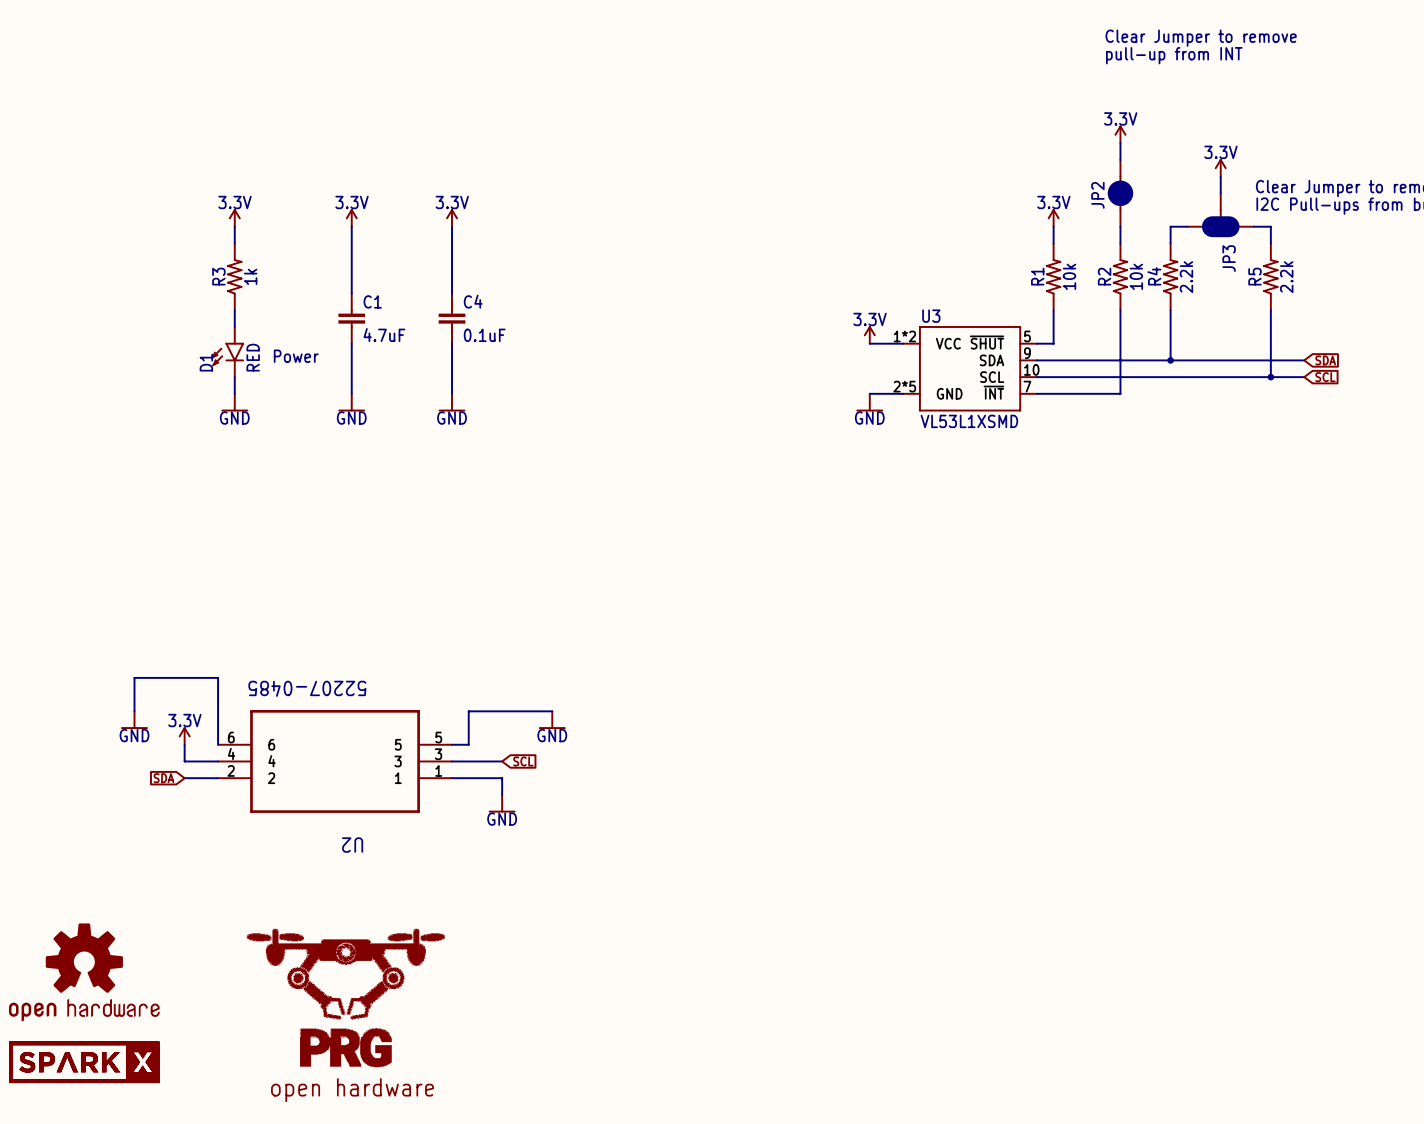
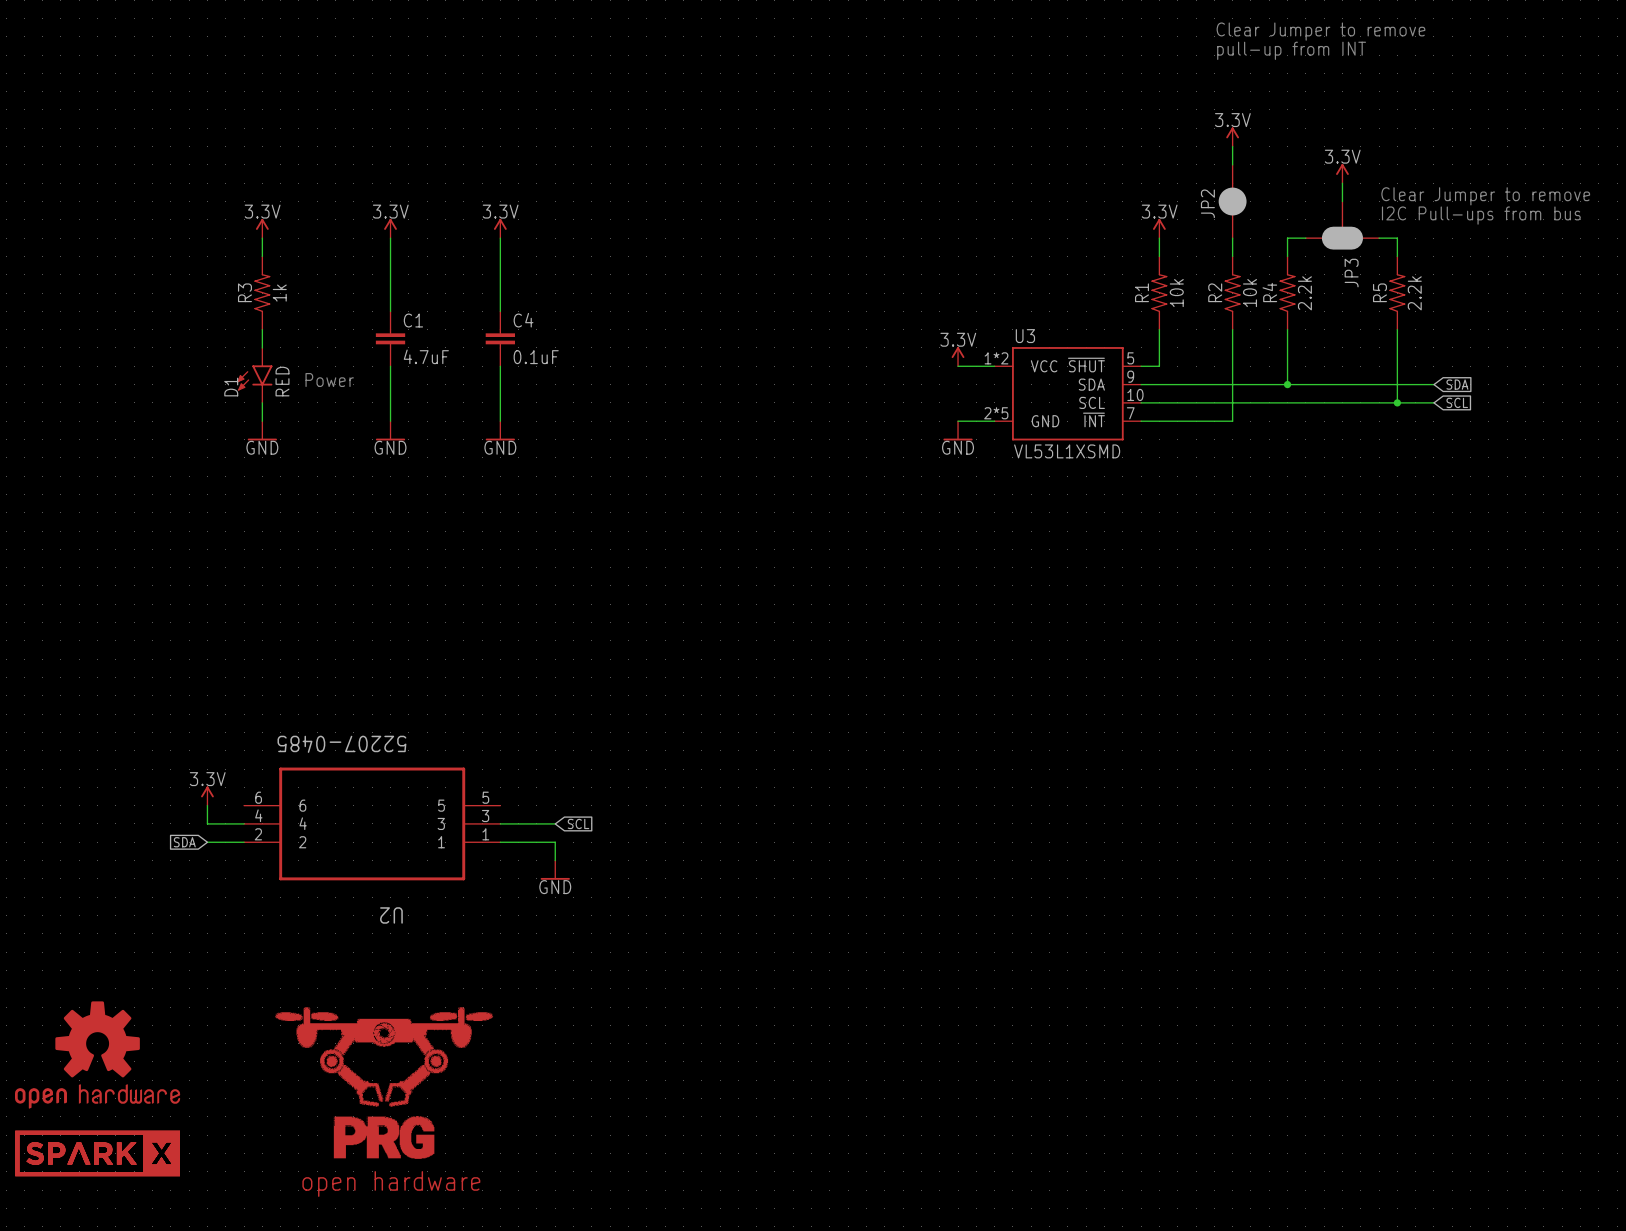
wire: (134, 711) (134, 677) (218, 677) (218, 744) -> none
wire: (552, 711) (468, 711) (468, 744) (452, 744) -> none
power symbol: GND (134, 720) -> none
power symbol: GND (552, 720) -> none

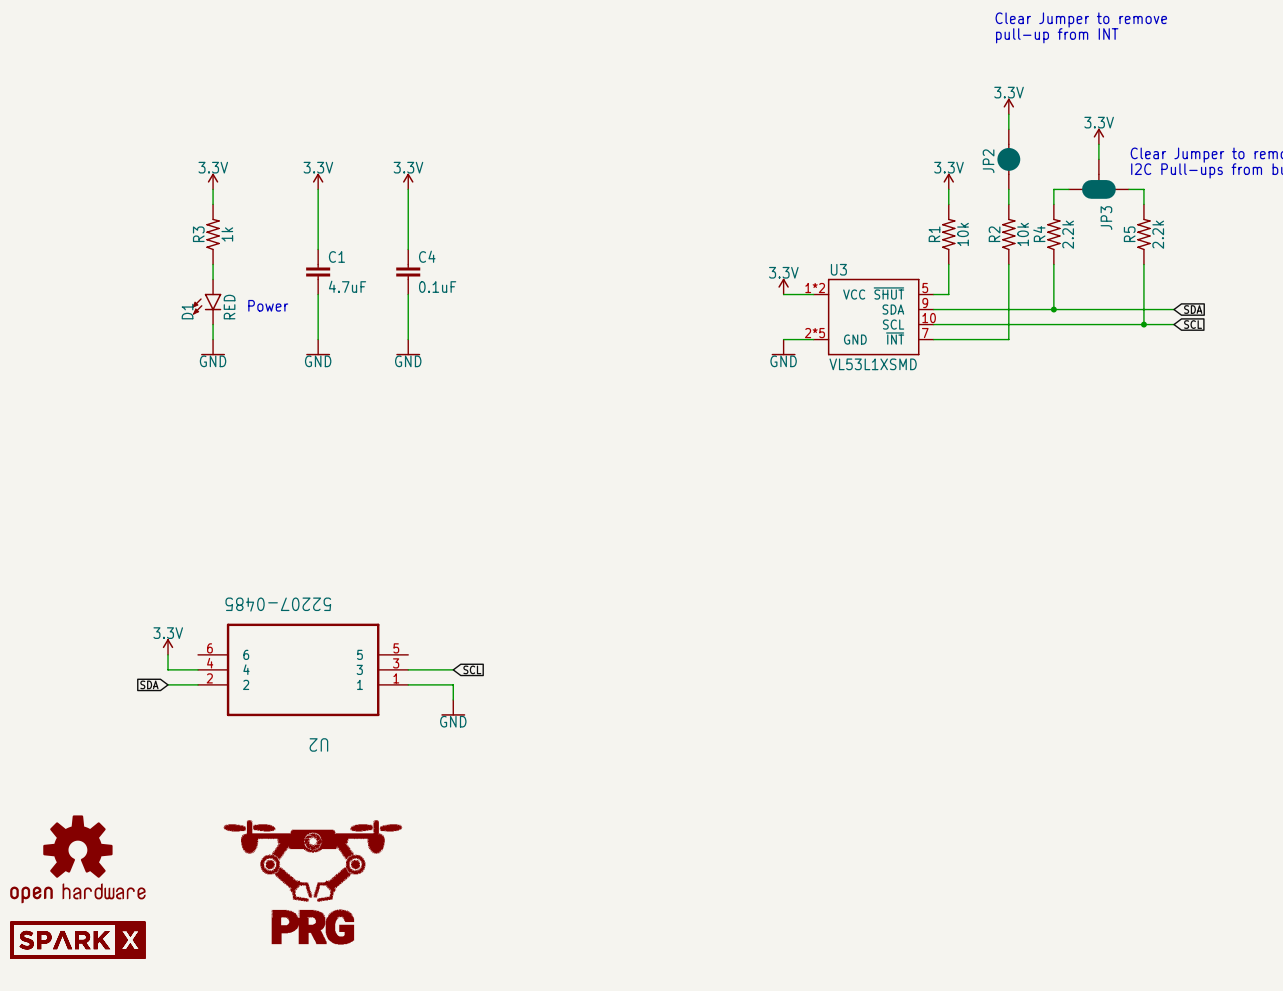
text: open hardware (391, 1183) -> none

